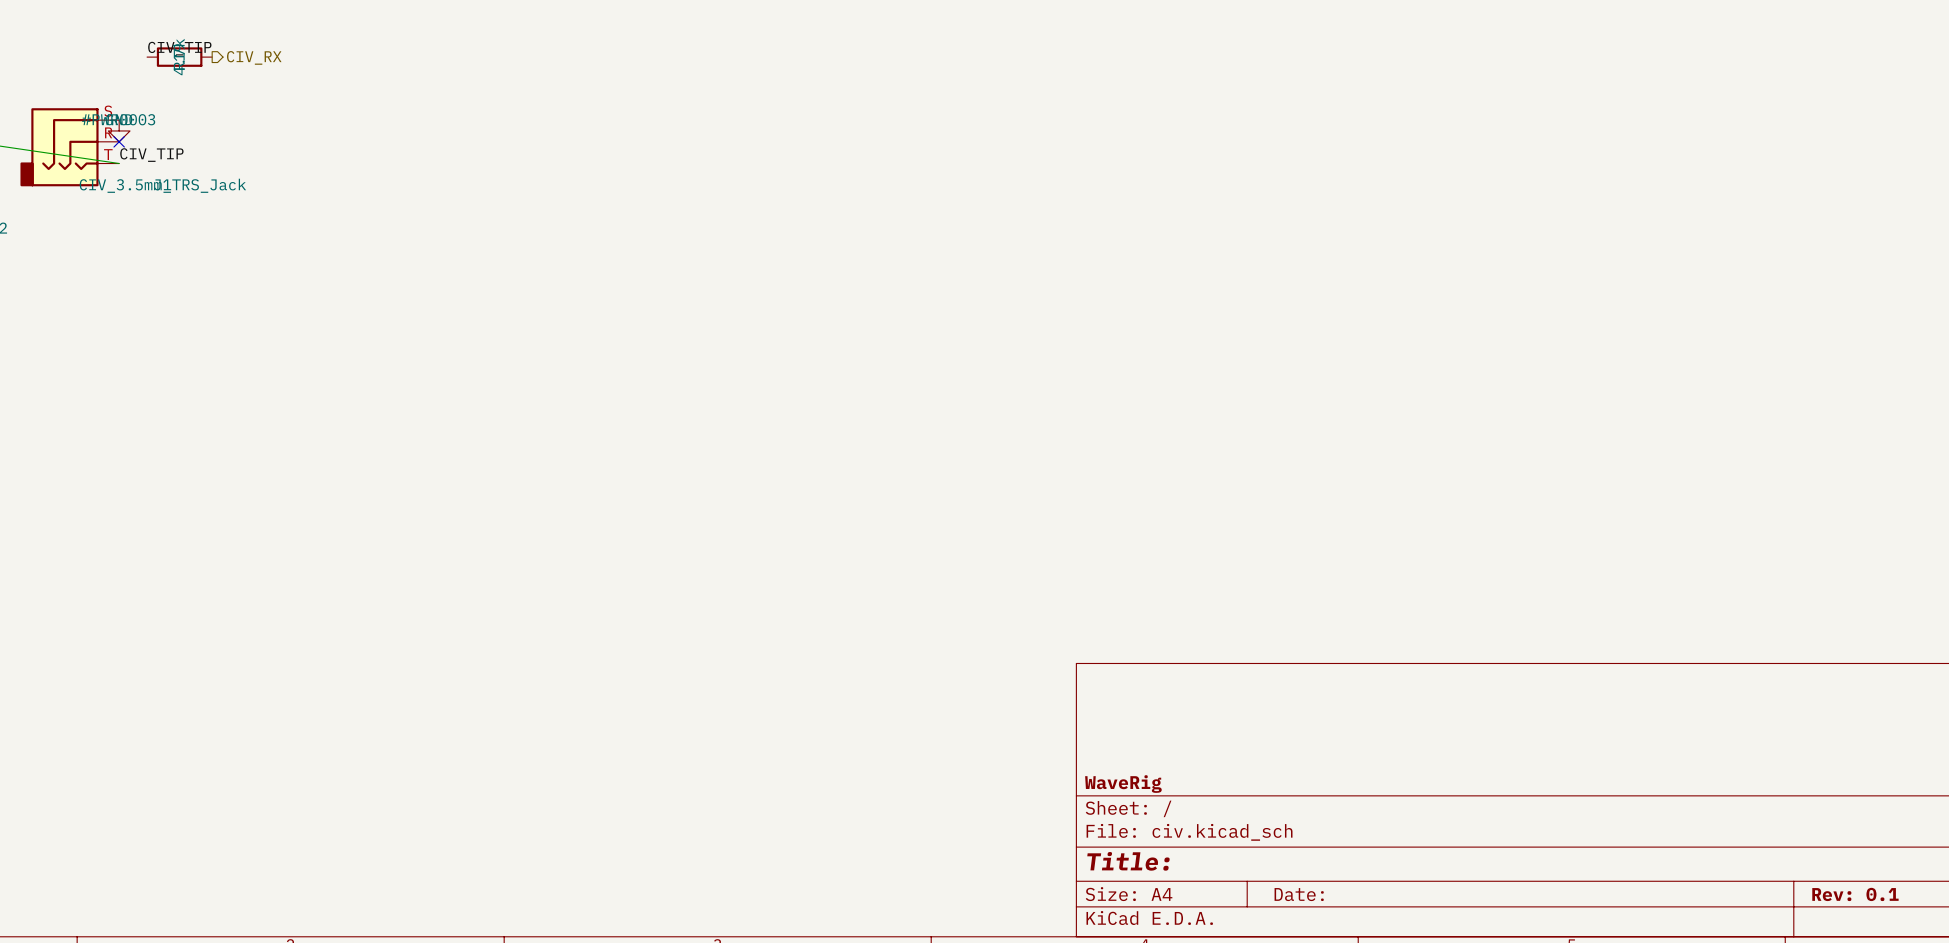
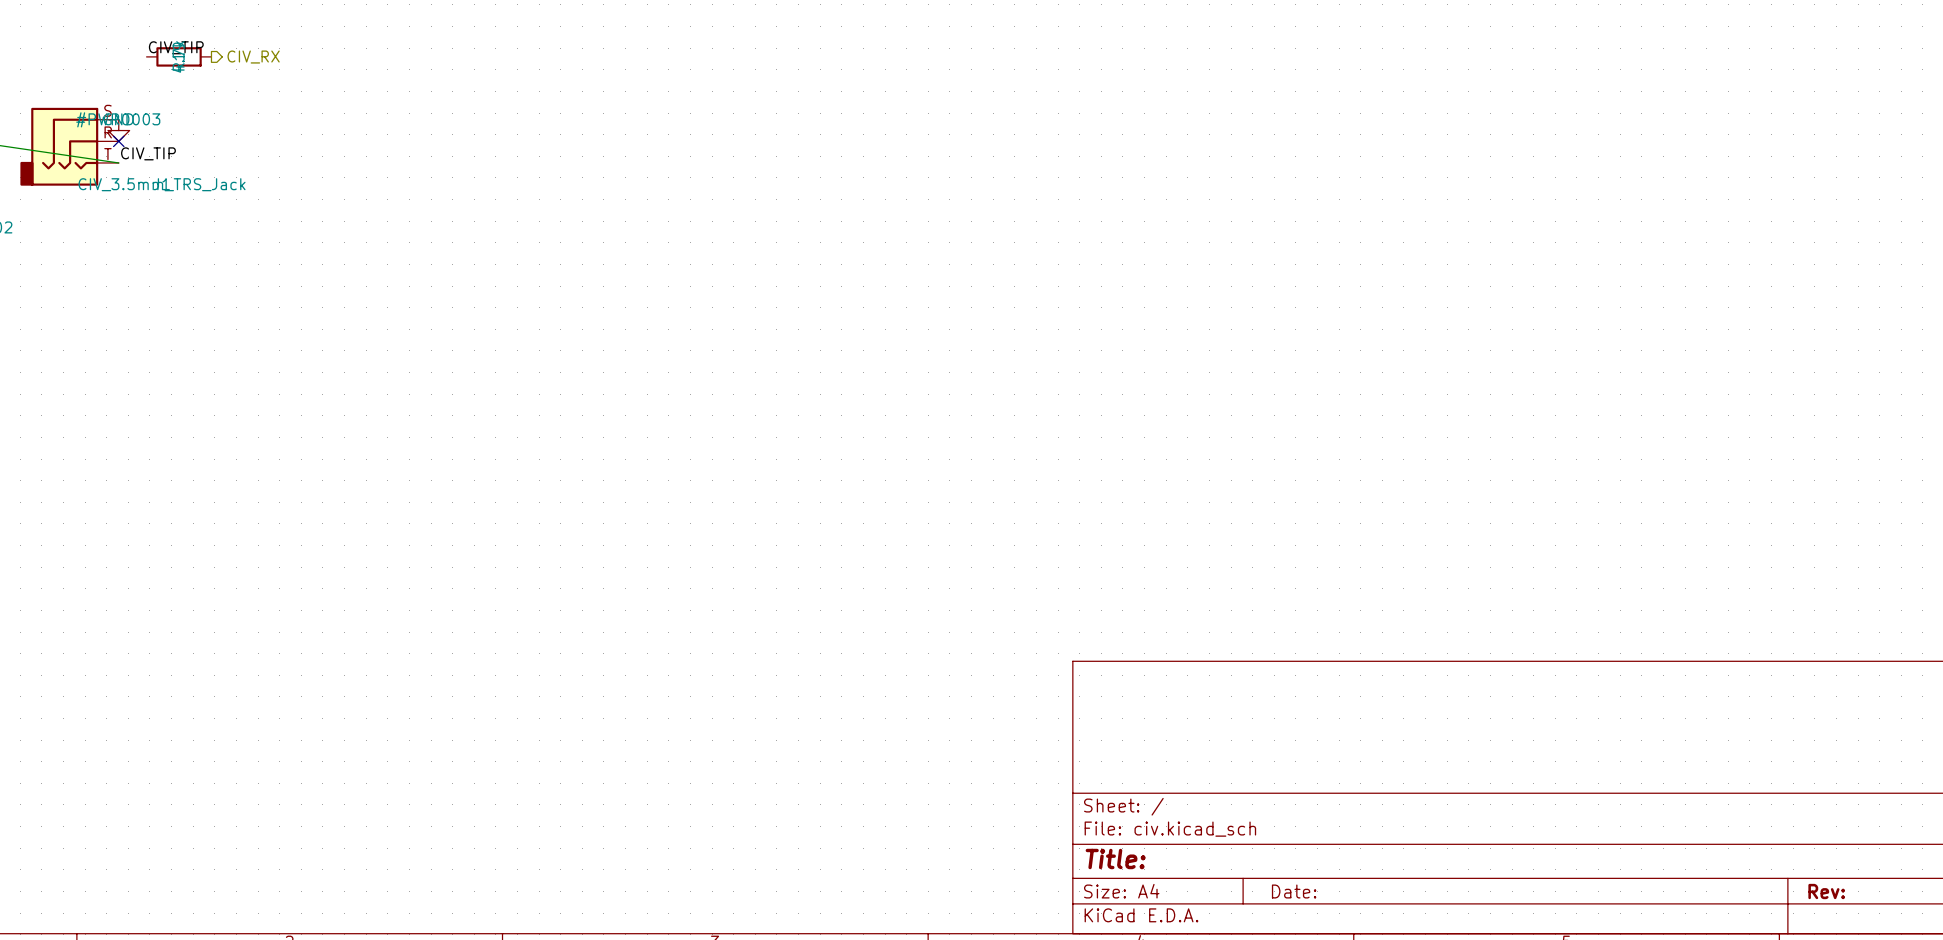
title block: WaveRig (1123, 784) -> none
title block: Rev: 0.1 (1855, 894) -> Rev: (1826, 891)

